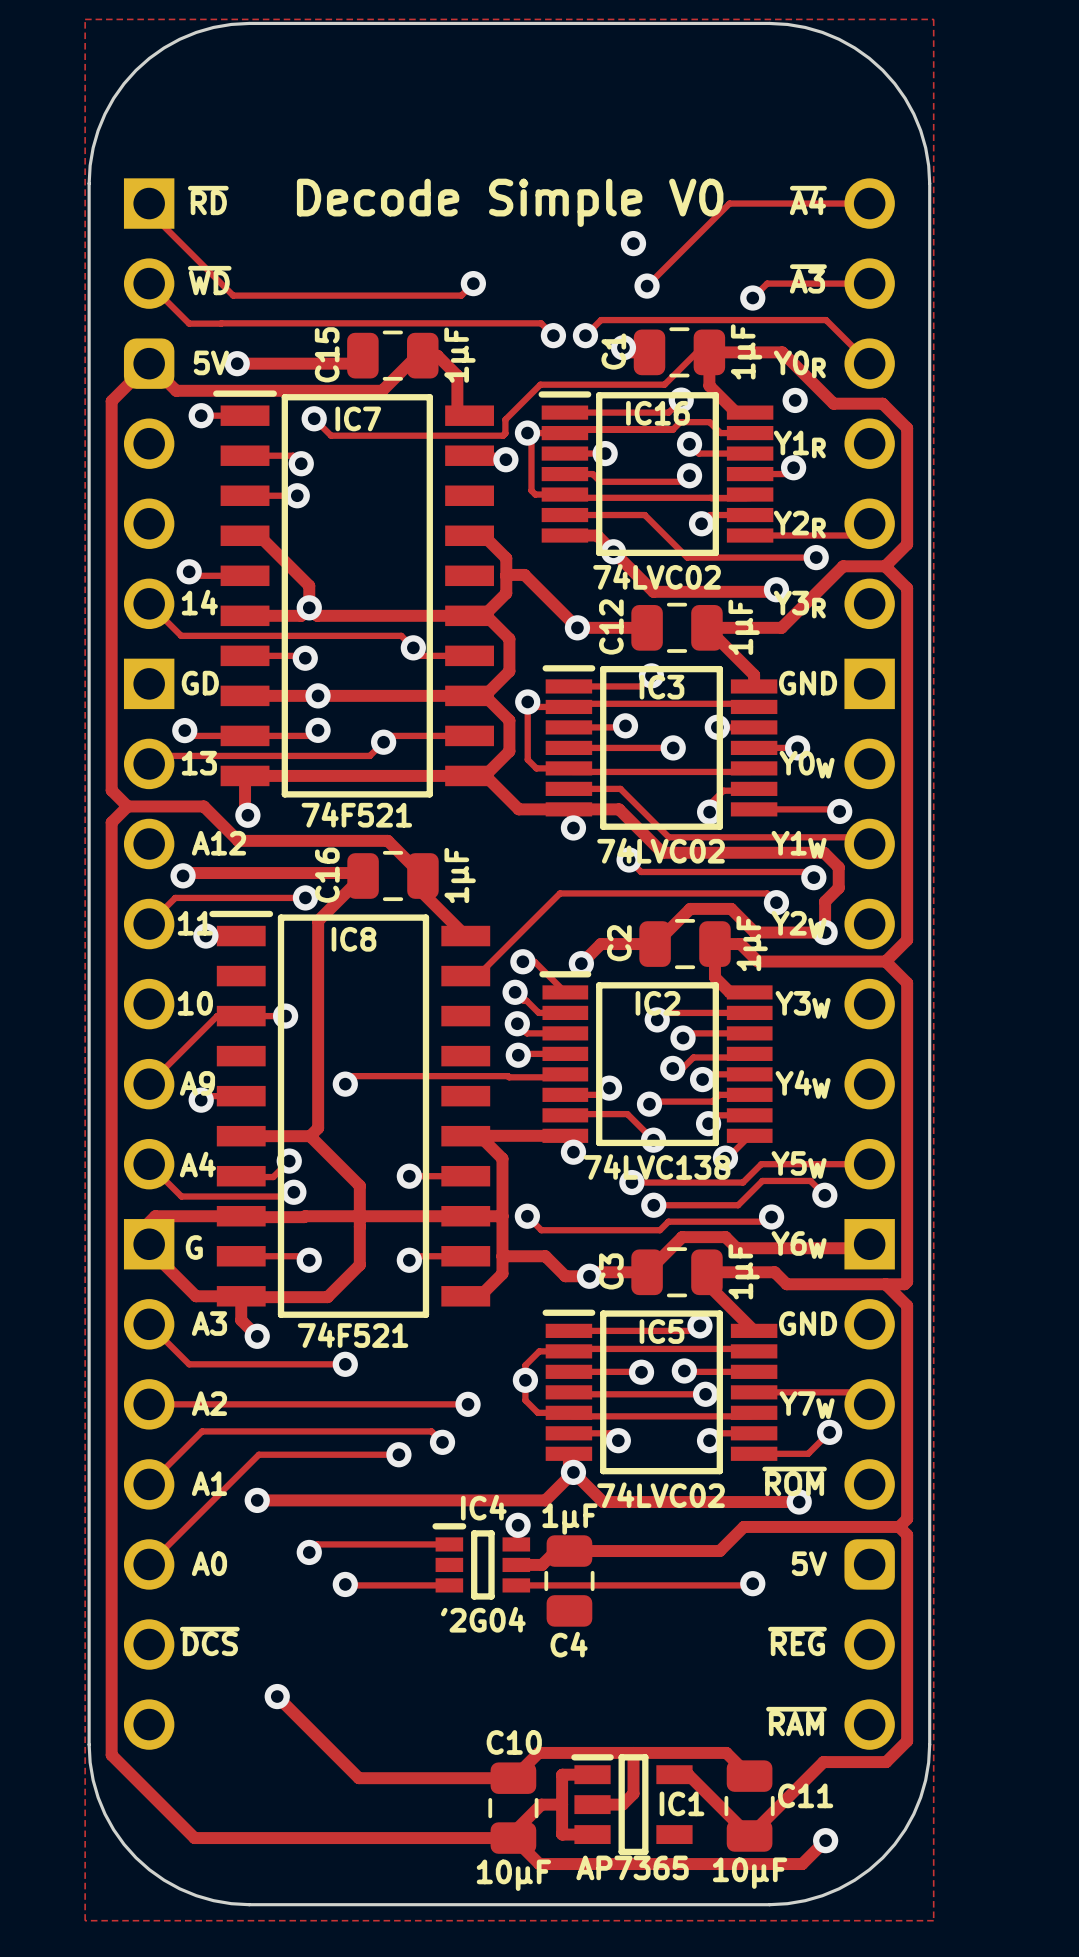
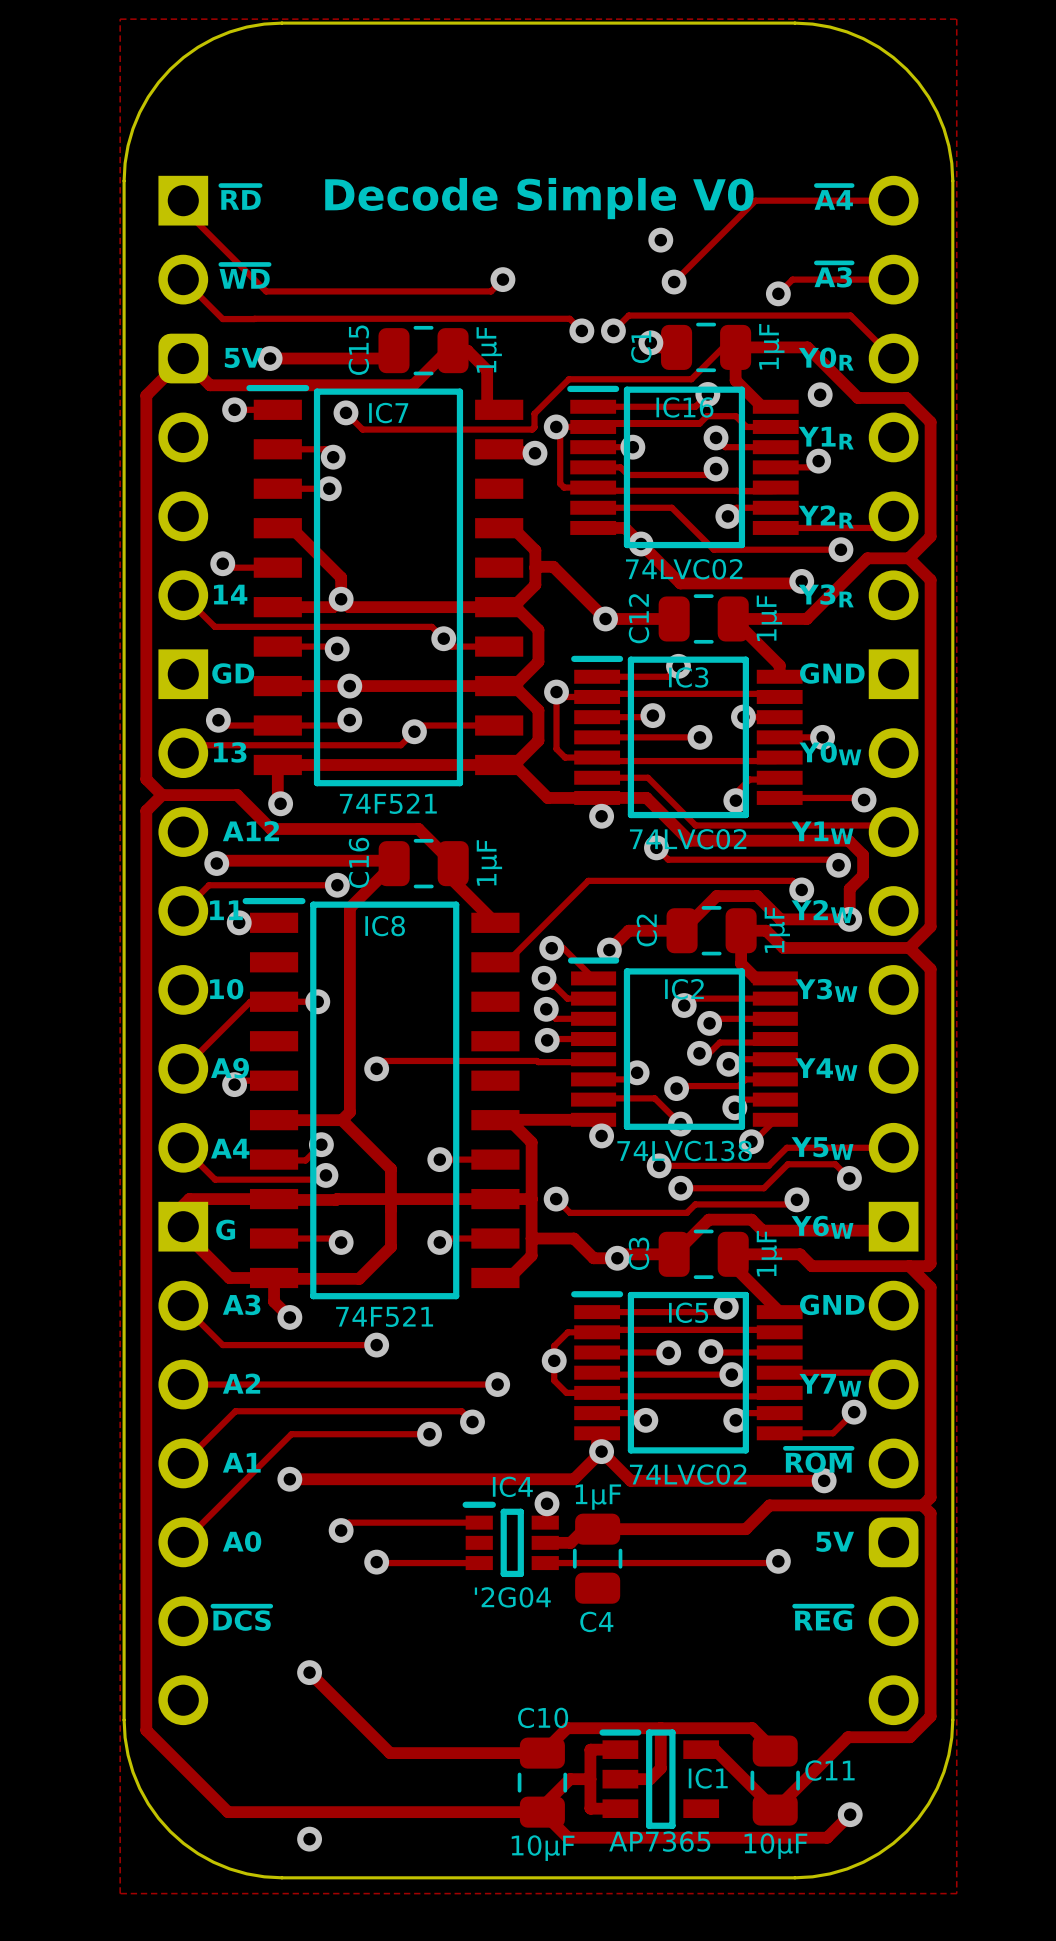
text: ~{RAM} (796, 1721) -> none
via: none -> (309, 1839)

